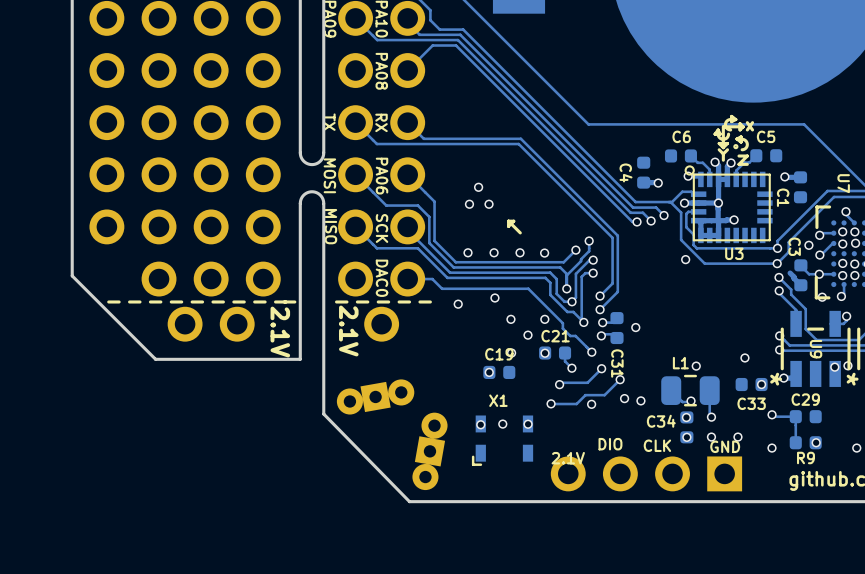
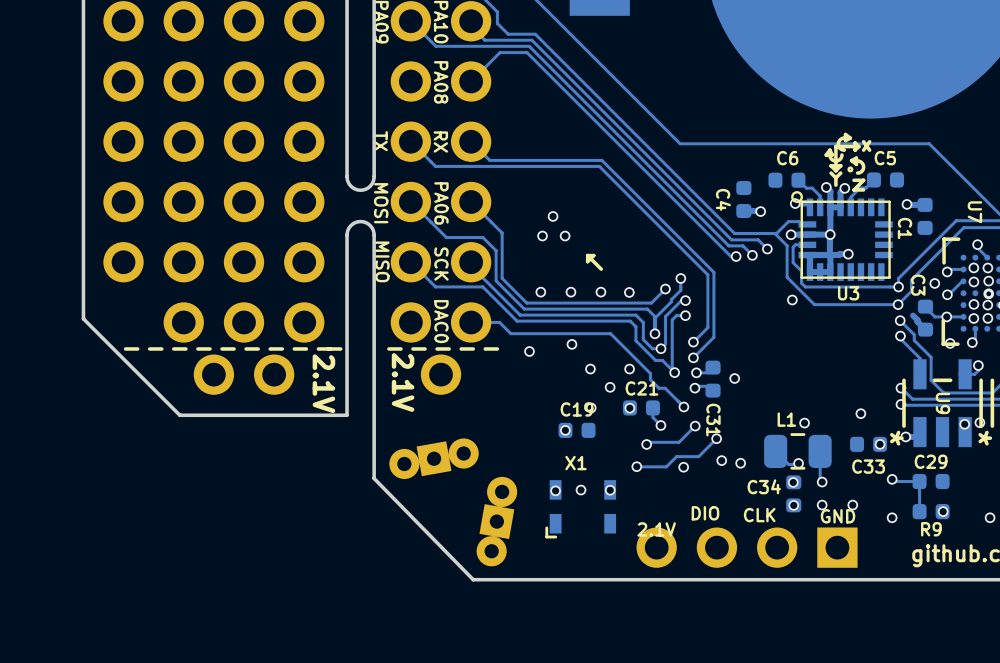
via: none -> (988, 293)

